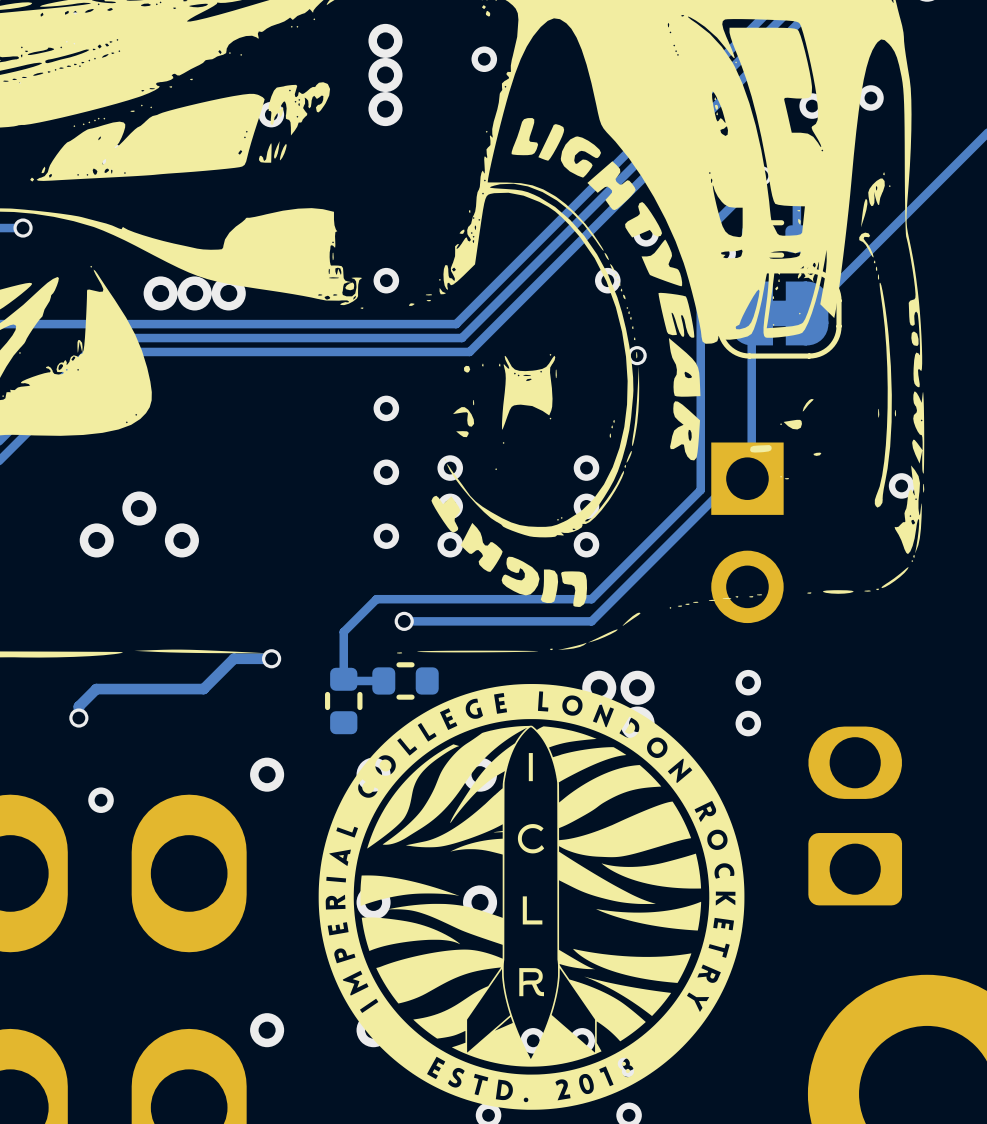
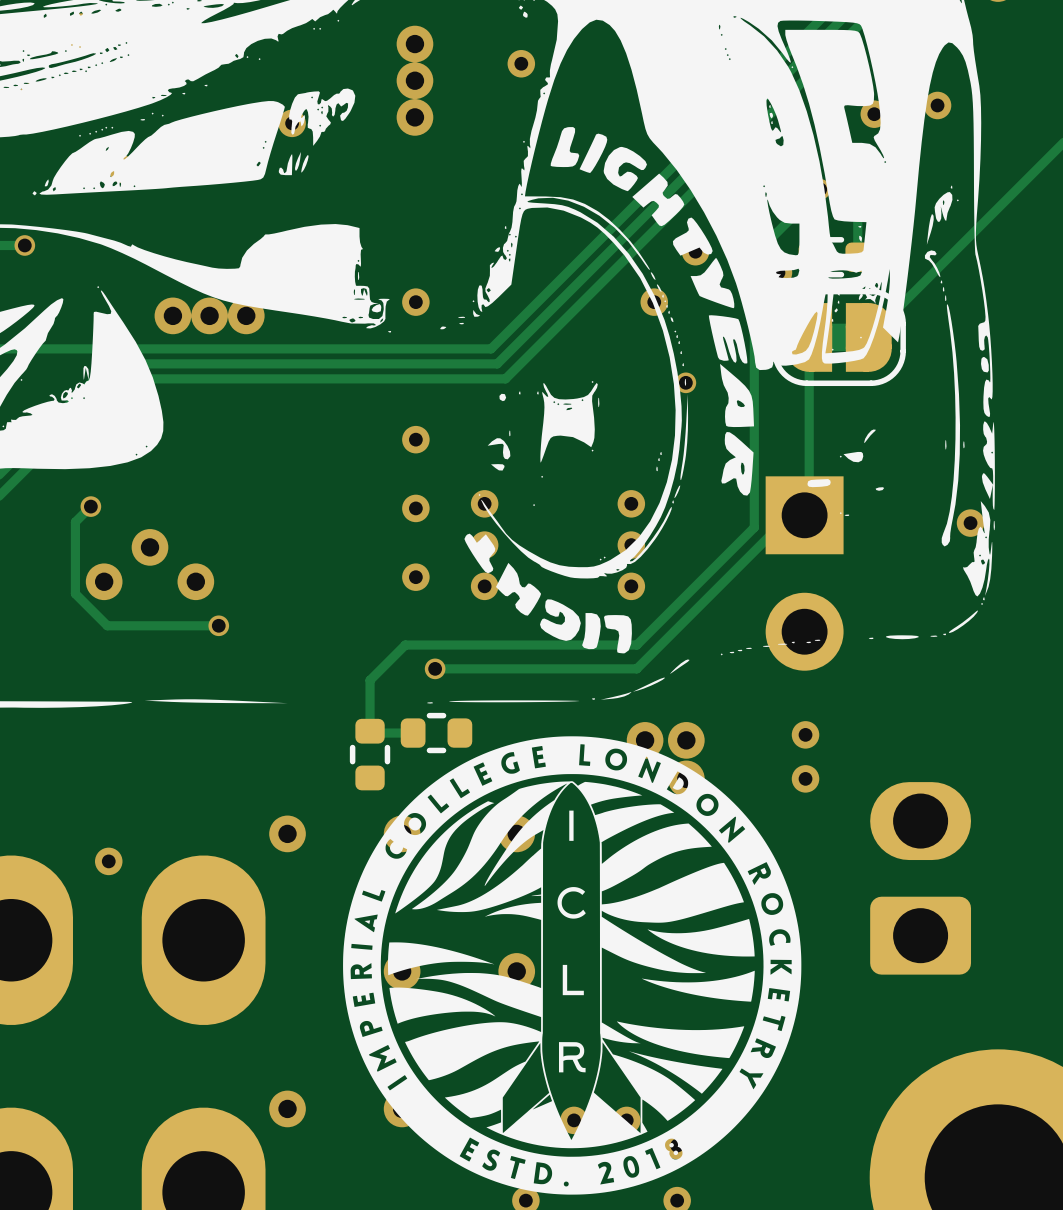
track: none -> (90, 506) (75, 522) (75, 593) (107, 625) (218, 625)
via: none -> (90, 506)
via: none -> (218, 625)
track: (271, 658) (233, 658) (203, 689) (96, 689) (78, 706) (78, 718) -> none
via: (271, 658) -> none
via: (78, 718) -> none

